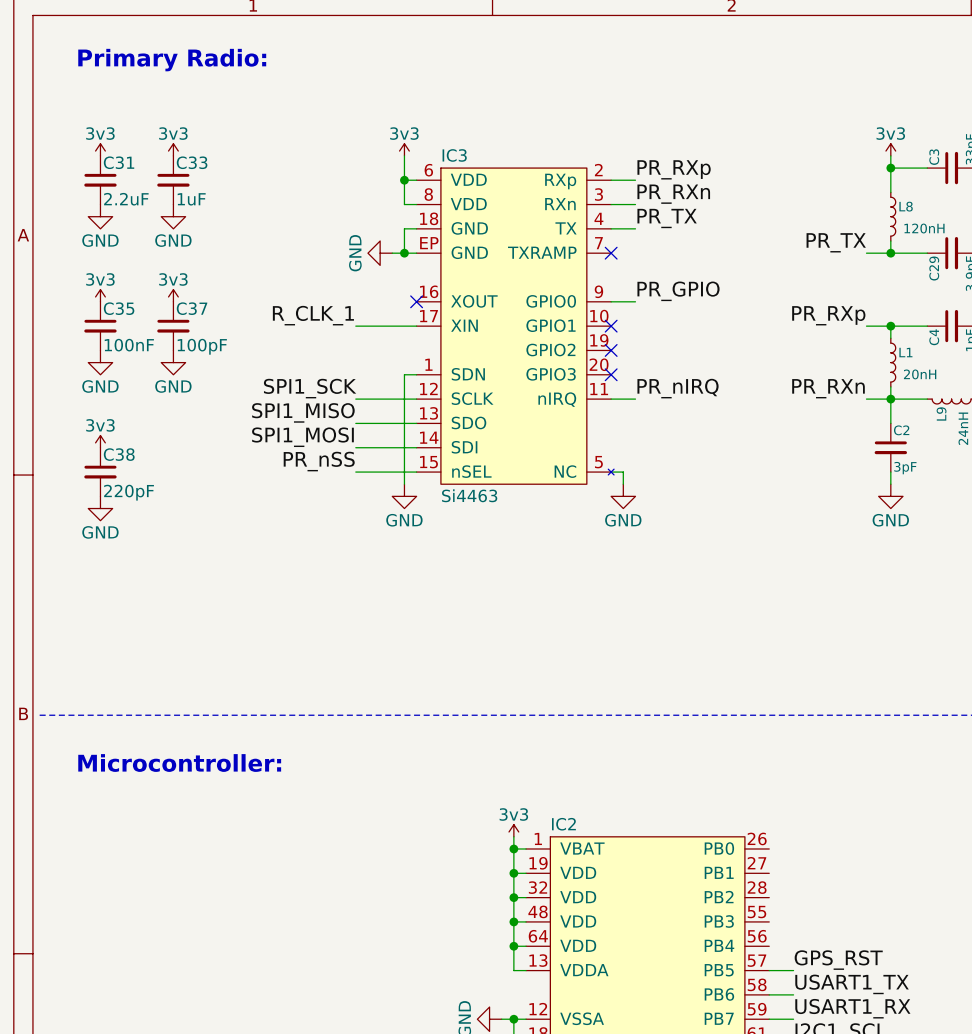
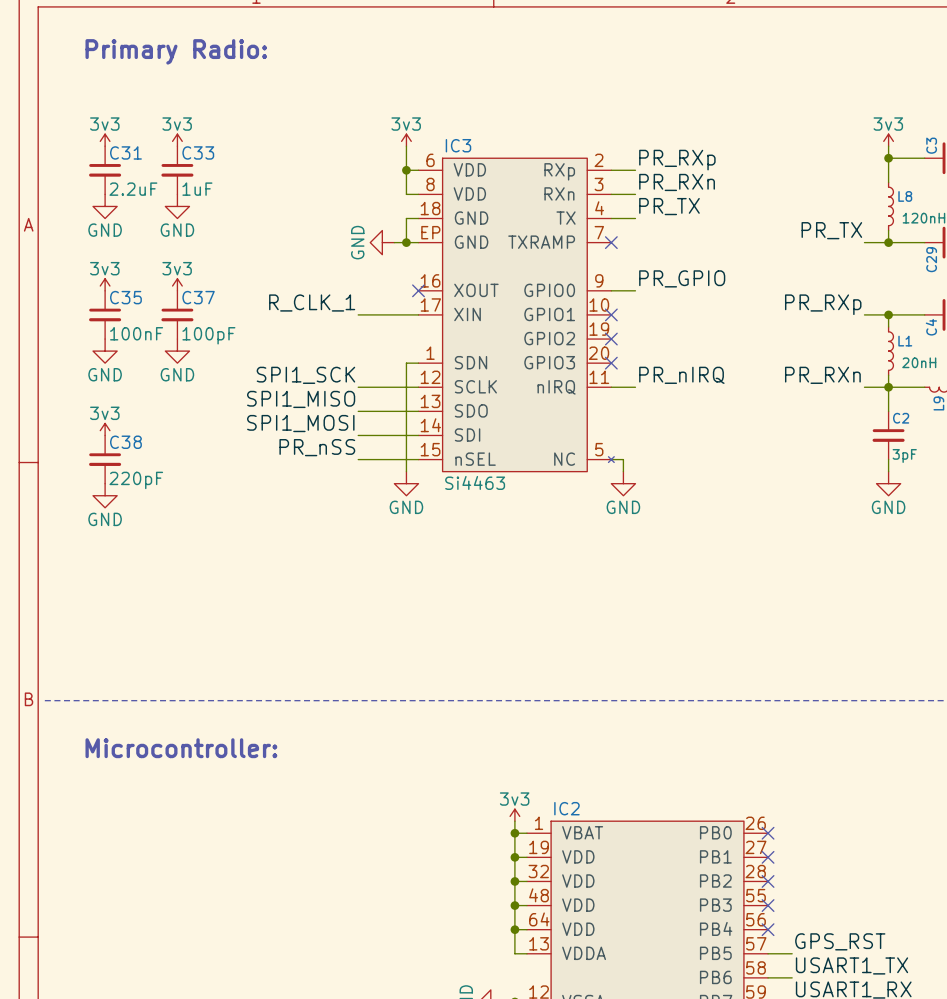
no-connect mark: none -> (768, 833)
no-connect mark: none -> (768, 857)
no-connect mark: none -> (768, 881)
no-connect mark: none -> (768, 905)
no-connect mark: none -> (768, 929)

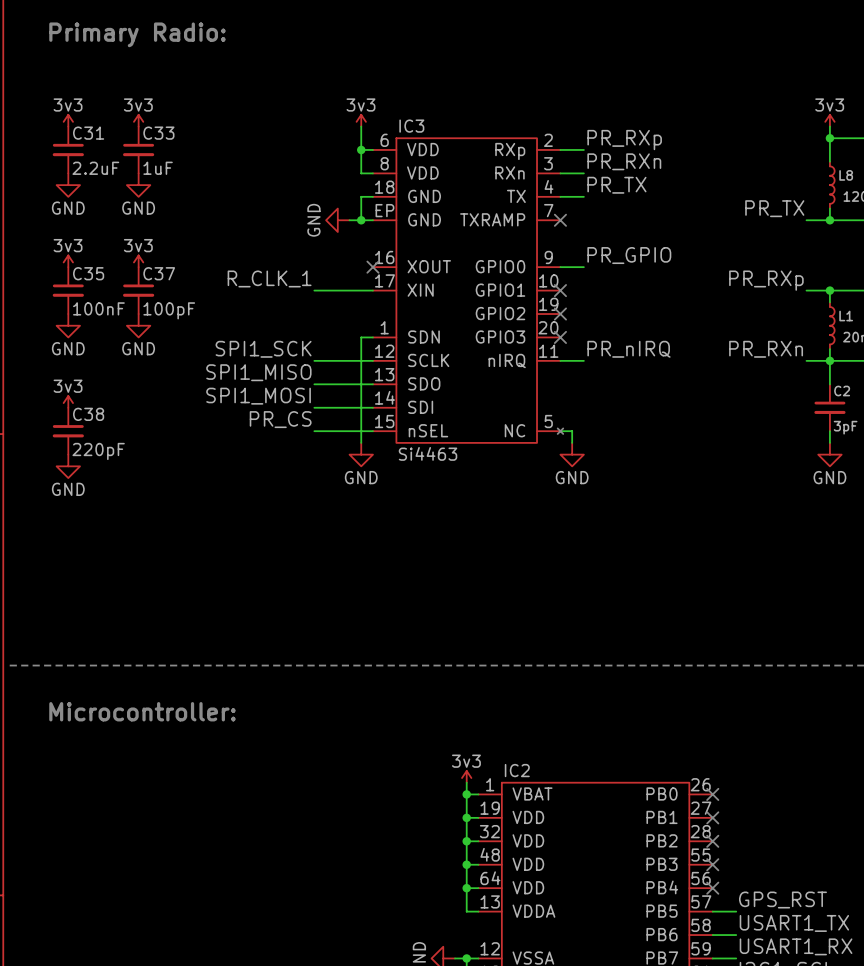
label: PR_nSS (317, 447) -> PR_CS (280, 419)

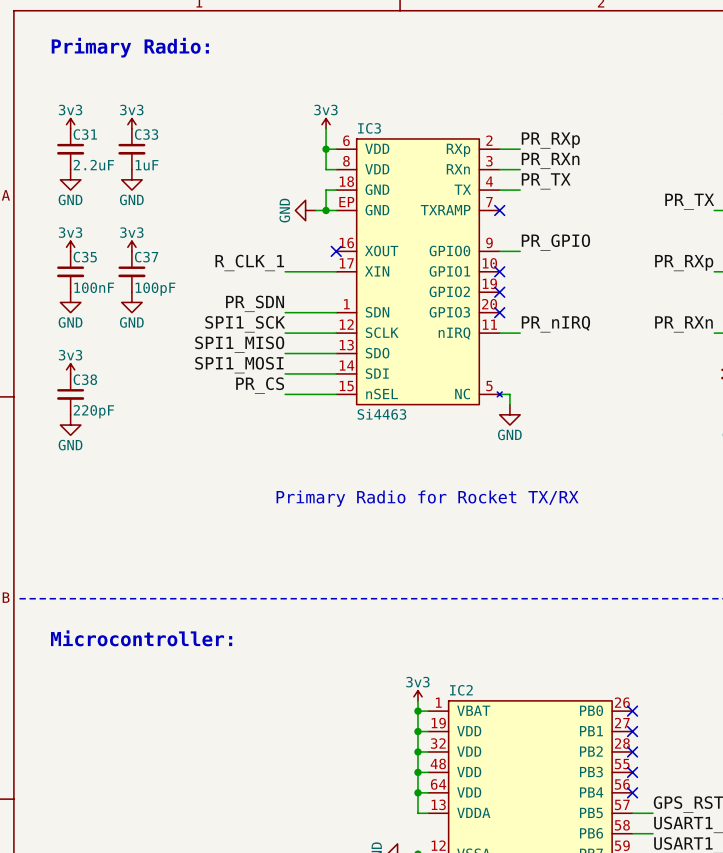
label: none -> PR_SDN (255, 303)
wire: (361, 337) (361, 442) -> (326, 312) (285, 312)
power symbol: GND (361, 454) -> none
text: none -> Primary Radio for Rocket TX/RX (427, 498)

